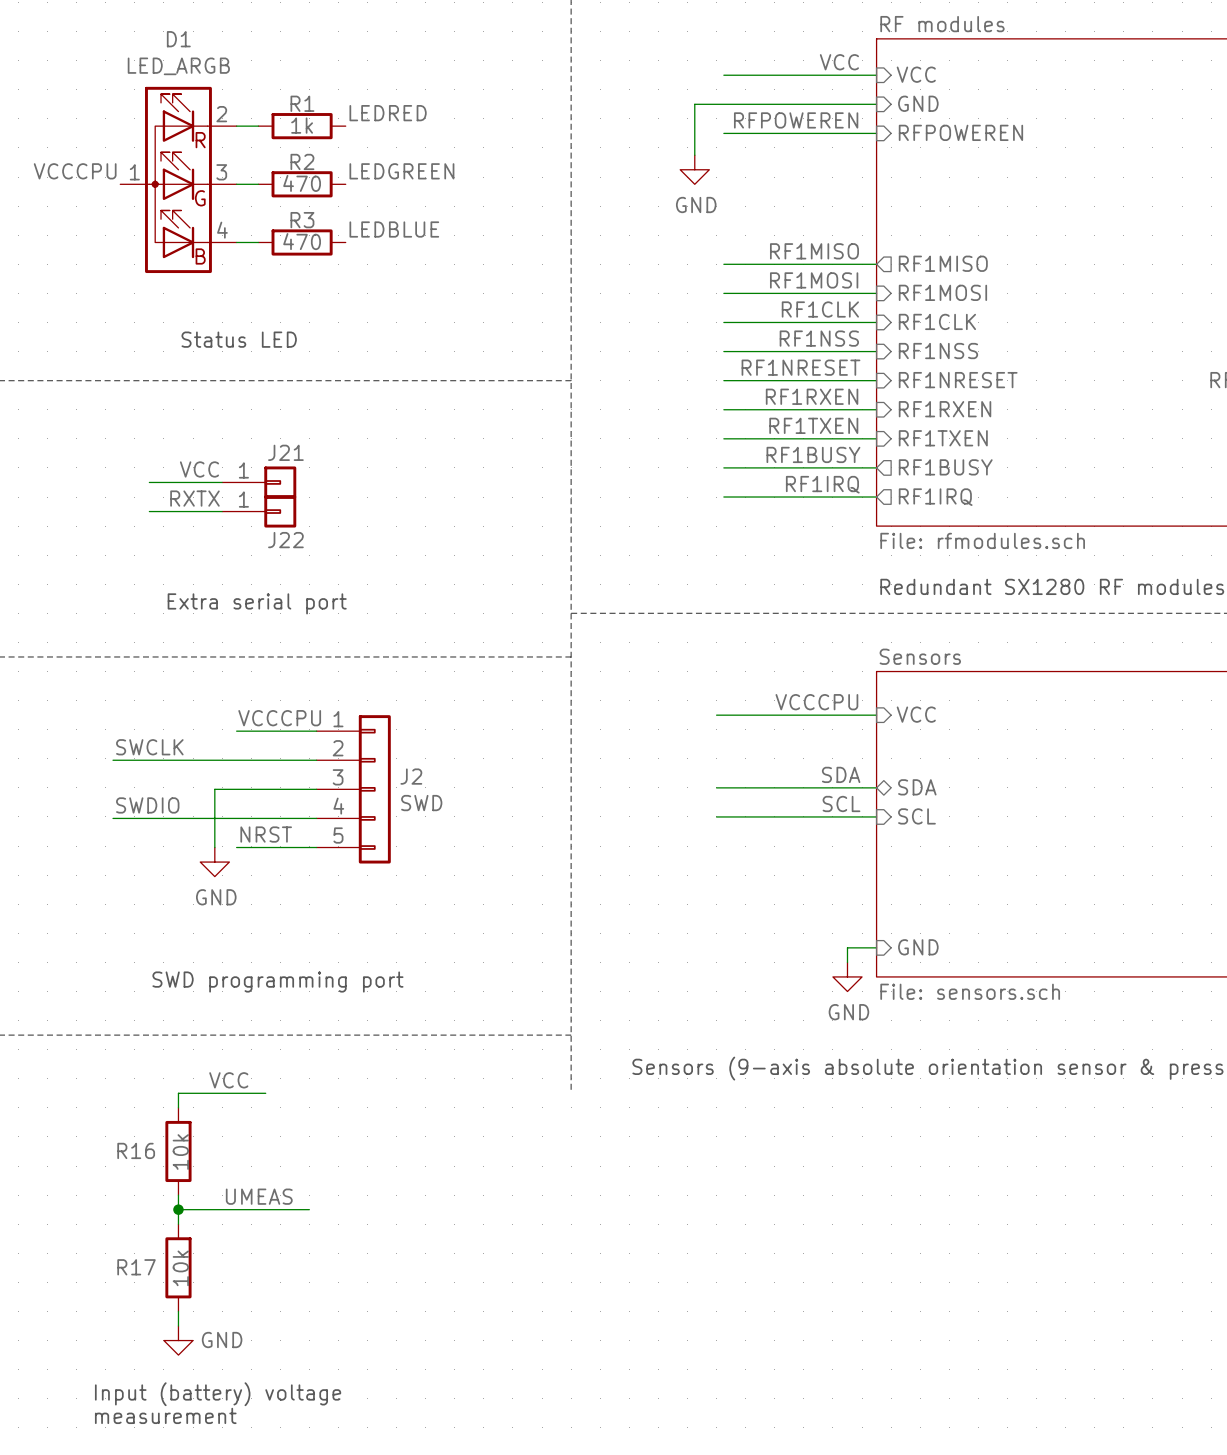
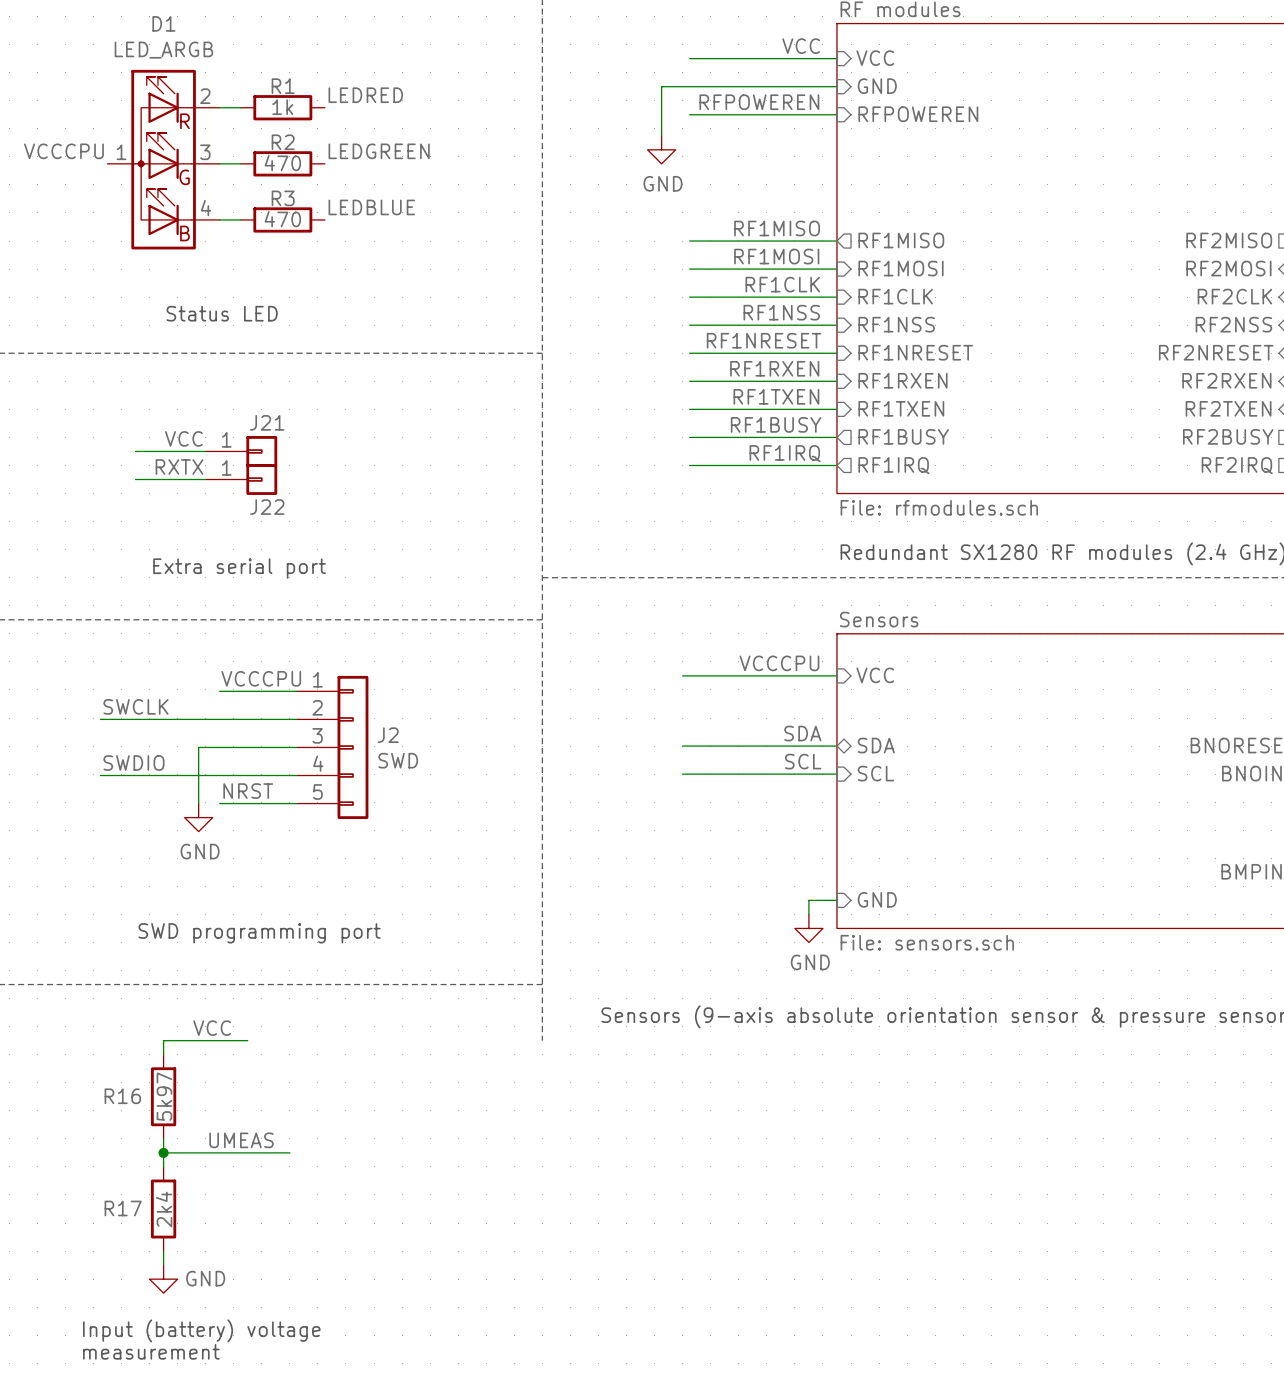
R16 value: 10k (180, 1152) -> 5k97 (164, 1096)
R17 value: 10k (180, 1268) -> 2k4 (164, 1209)

